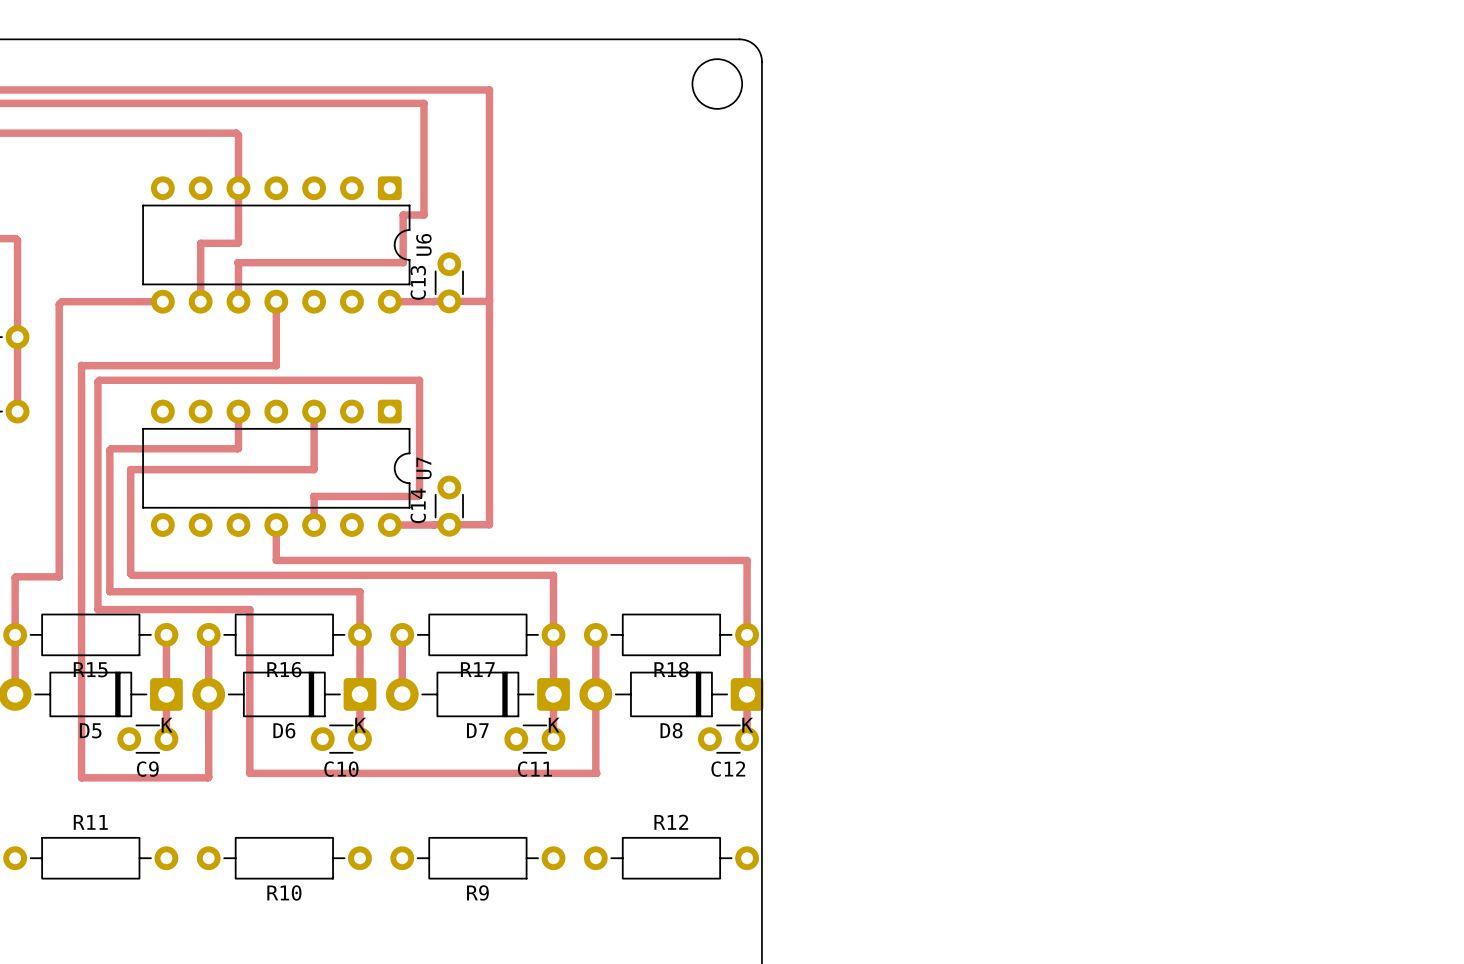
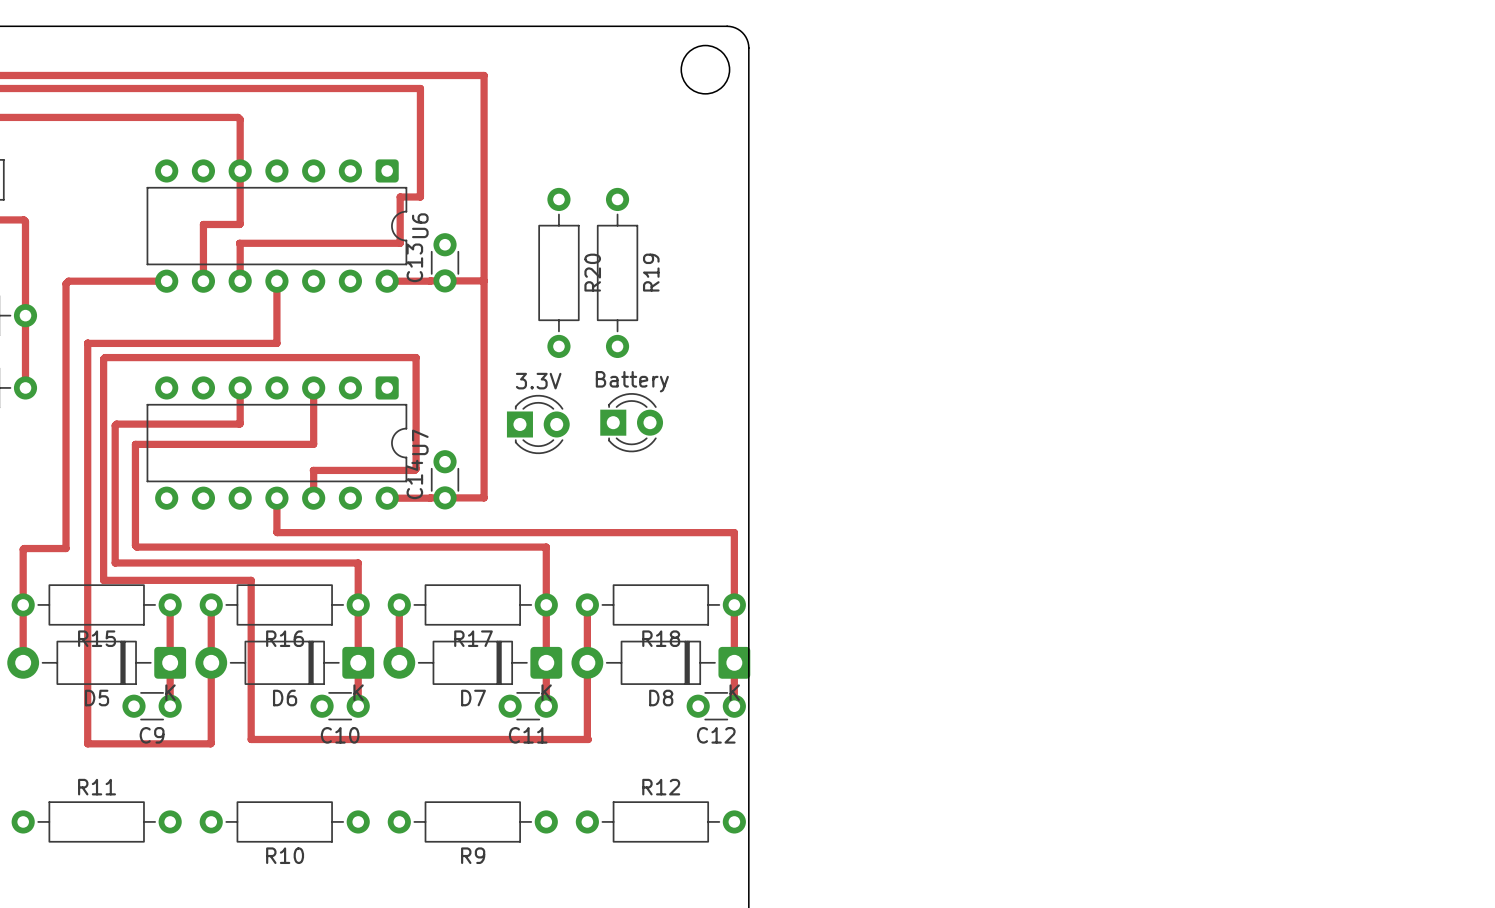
R20: none -> (558, 272)
R19: none -> (617, 272)
Battery: none -> (631, 422)
3.3V: none -> (538, 424)

